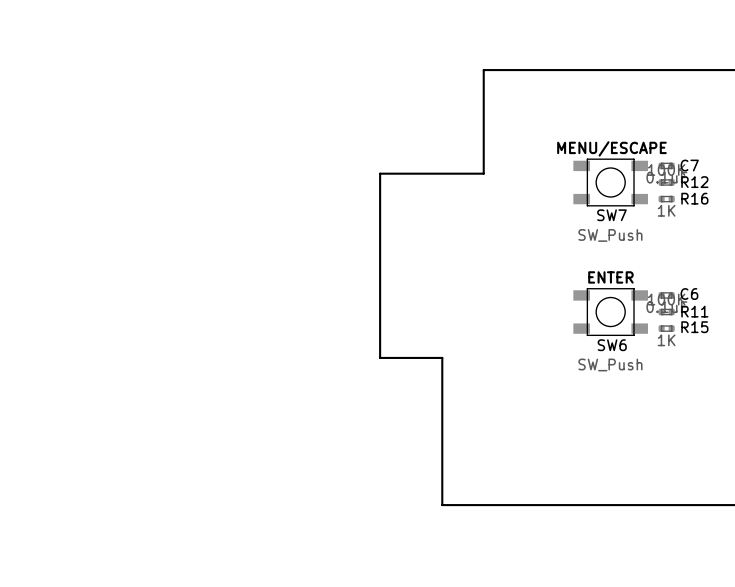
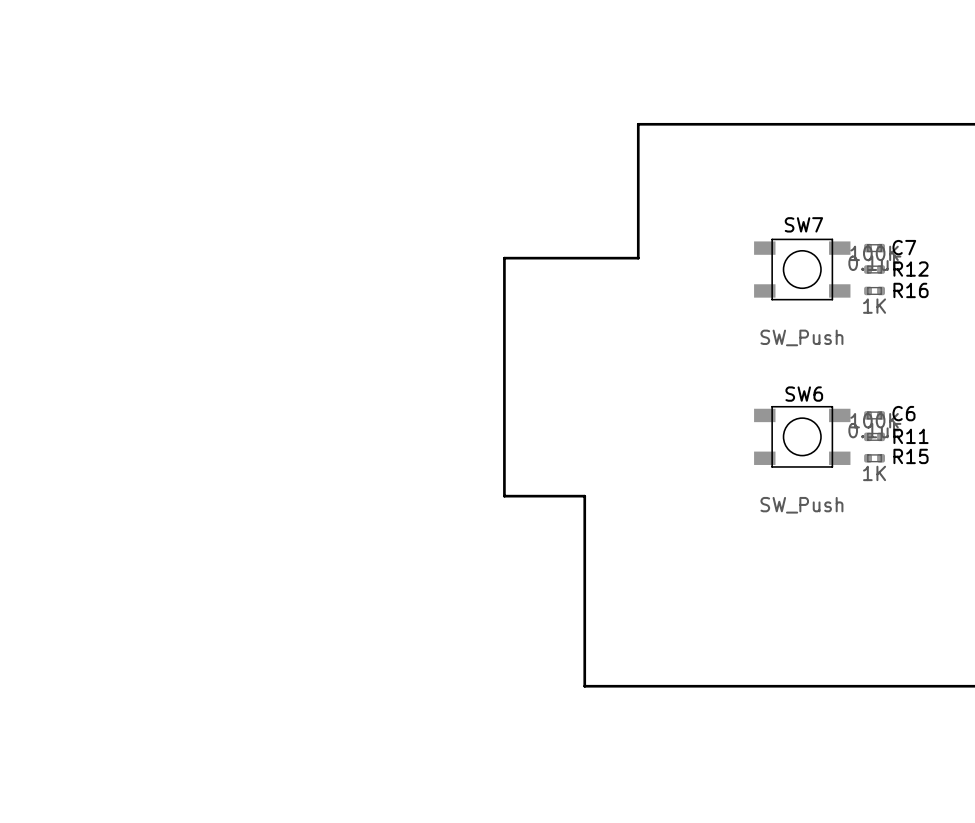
text: MENU/ESCAPE (611, 148) -> none
SW7 name position: SW7 (611, 215) -> SW7 (803, 224)
text: ENTER (610, 277) -> none
SW6 name position: SW6 (612, 345) -> SW6 (804, 394)

